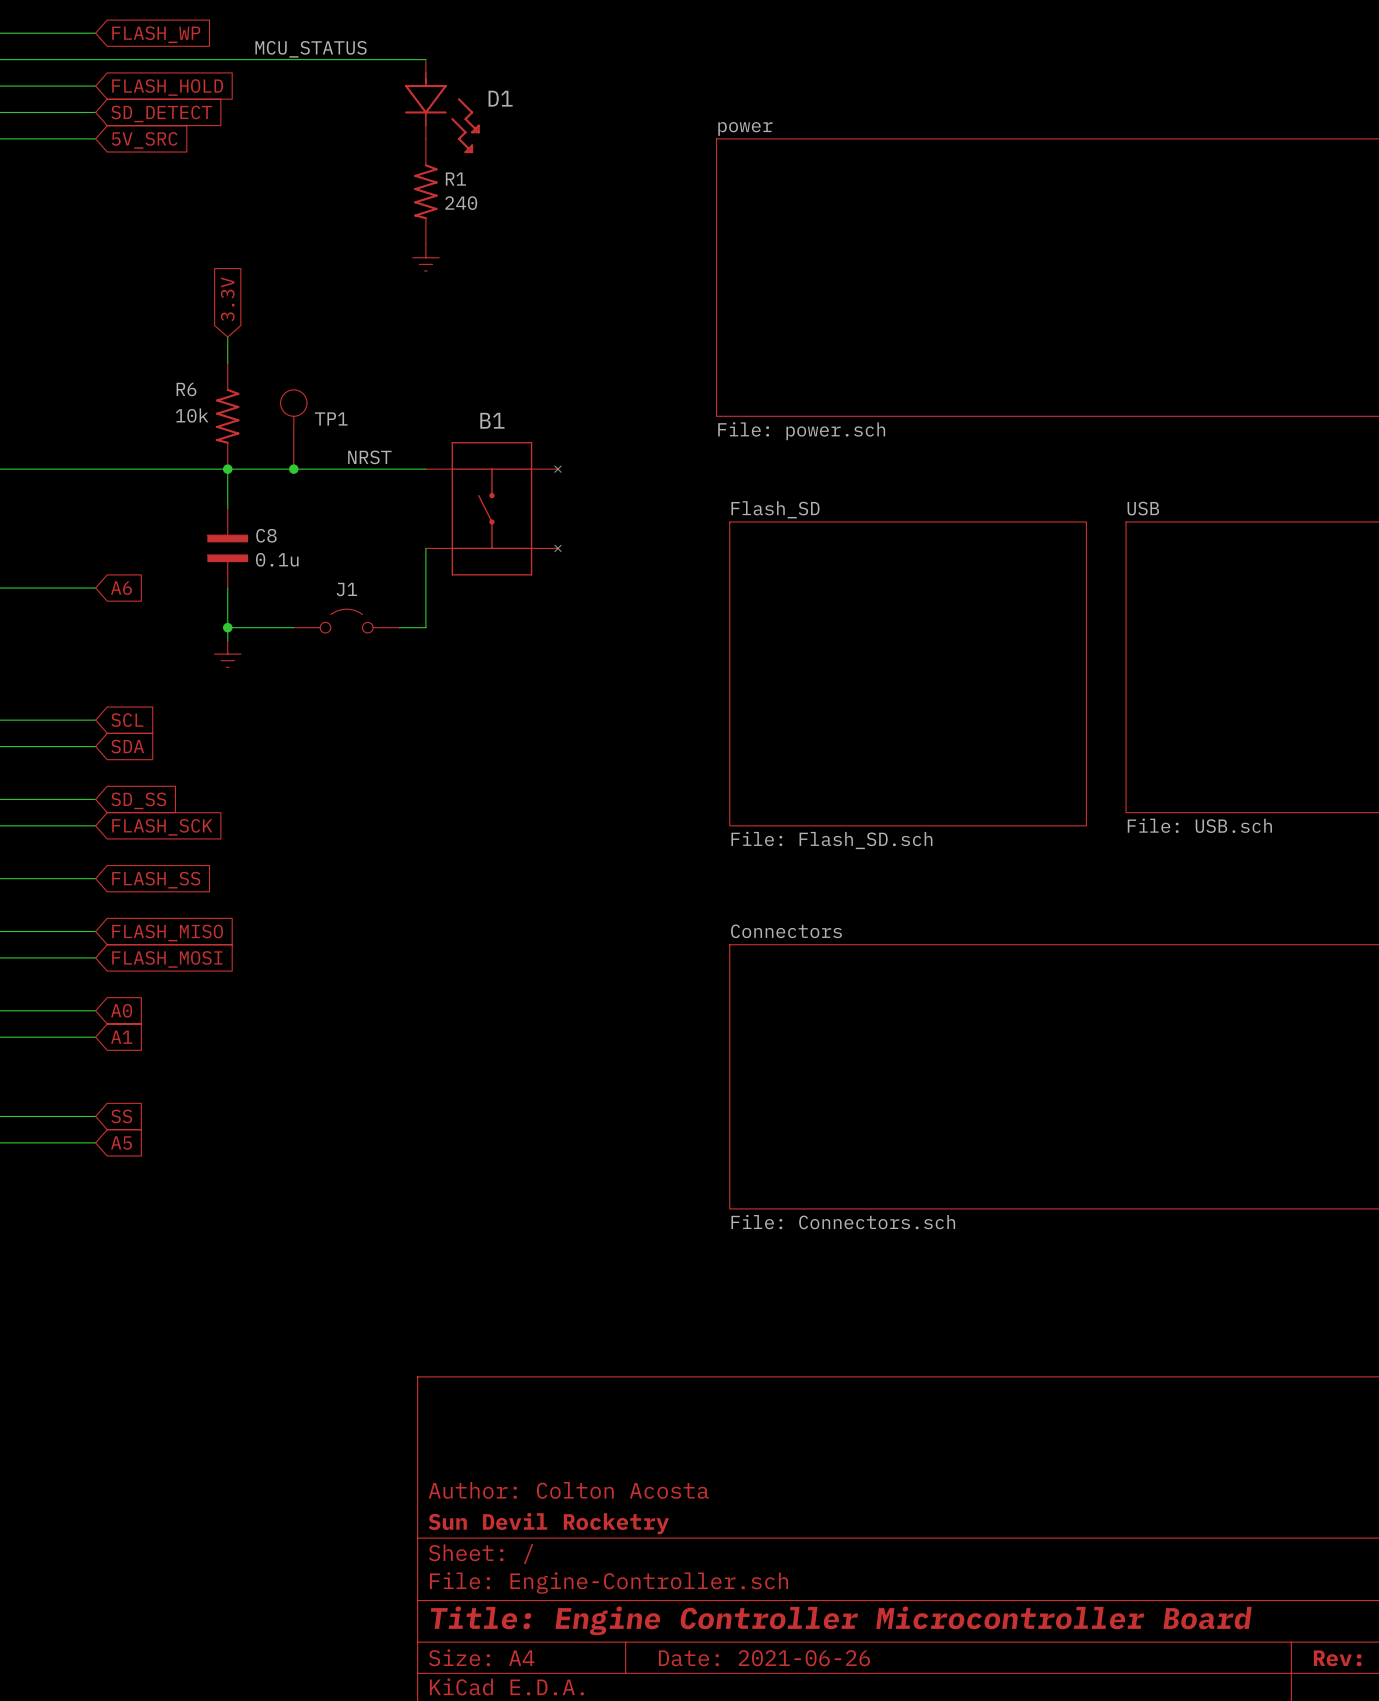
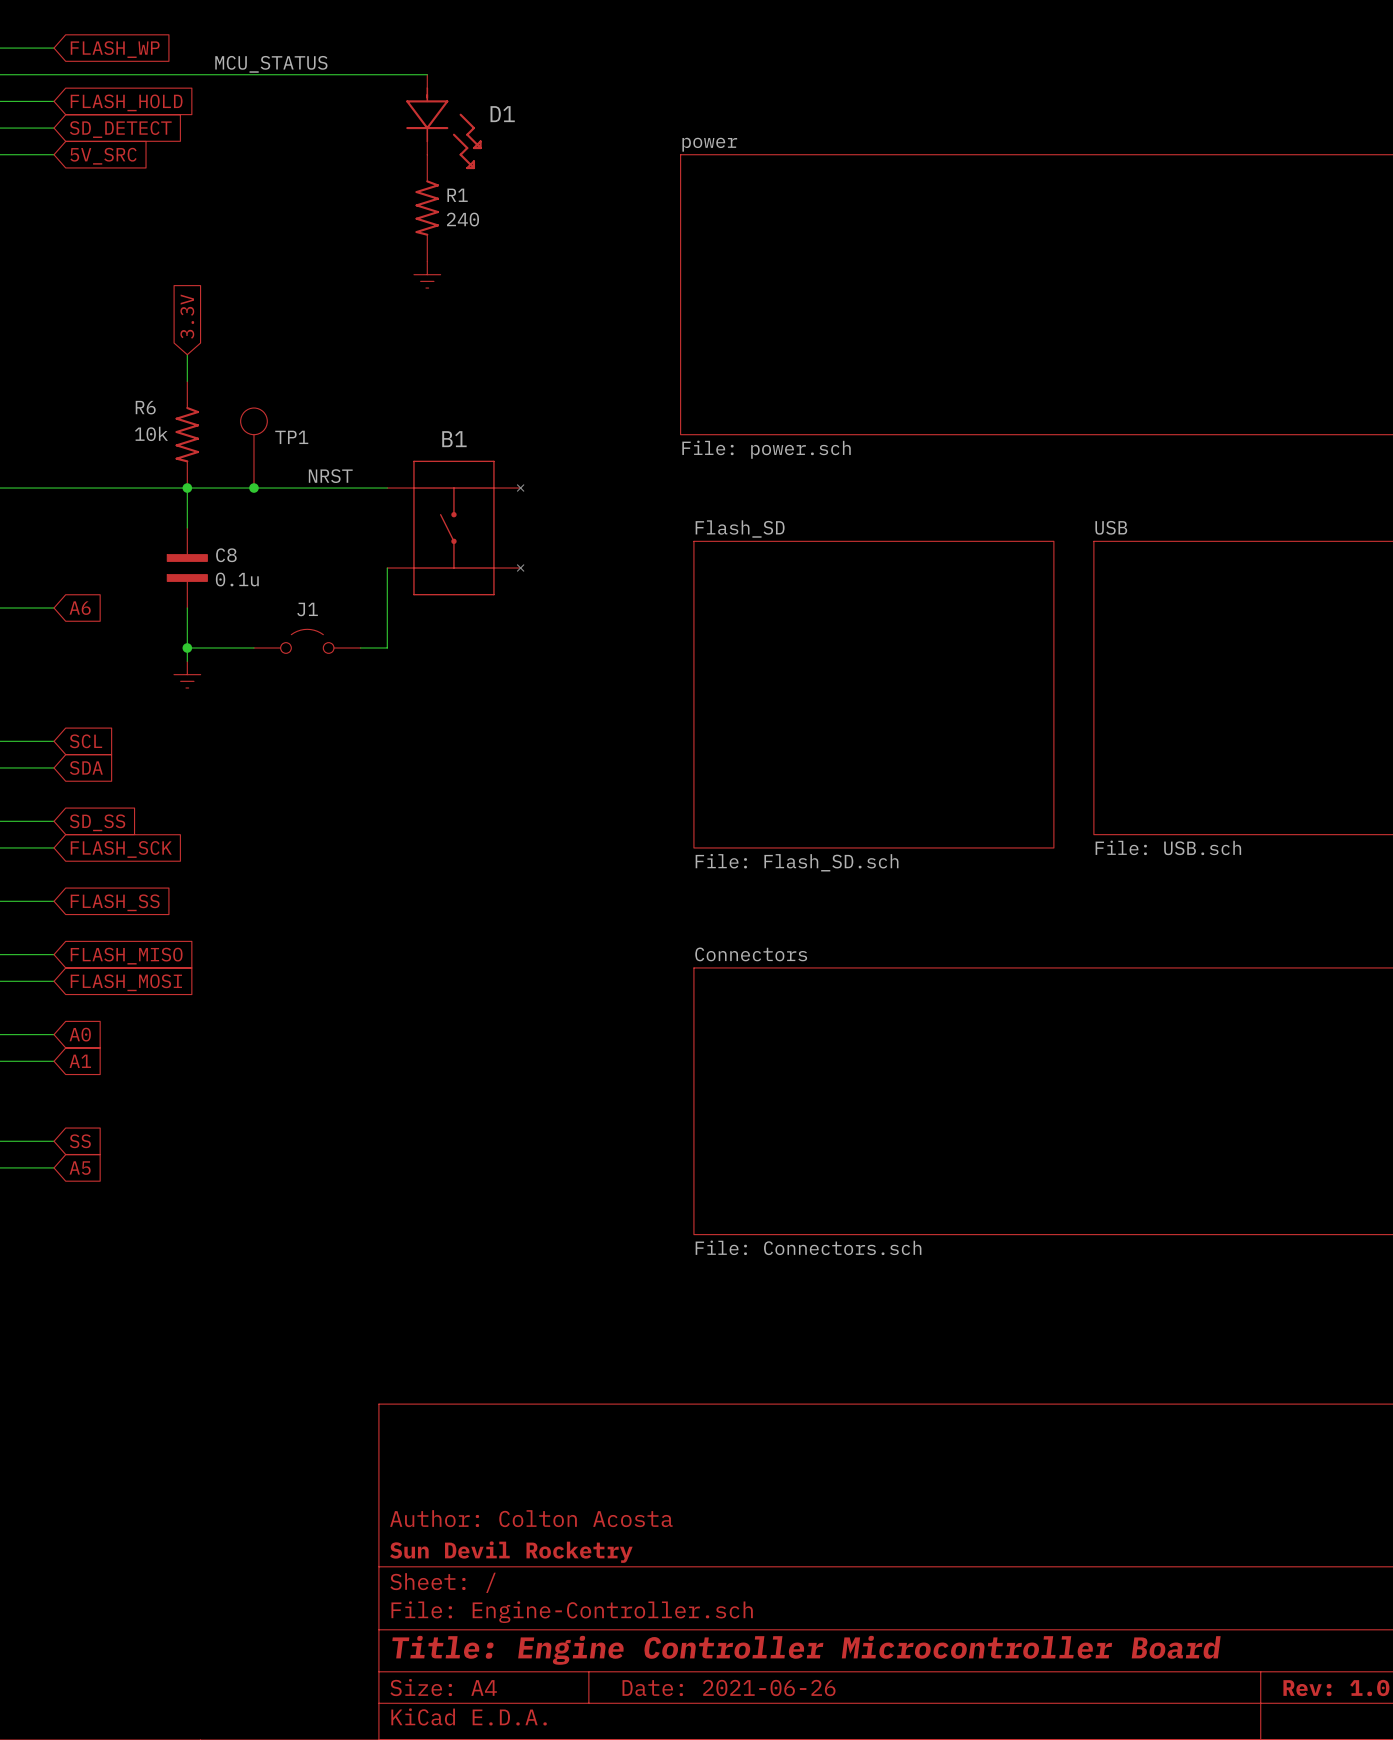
wire: none -> (387, 74) (427, 74)
D1 position: (442, 106) -> (443, 121)
R1 position: (425, 191) -> (427, 208)
power symbol position: (425, 257) -> (427, 274)

